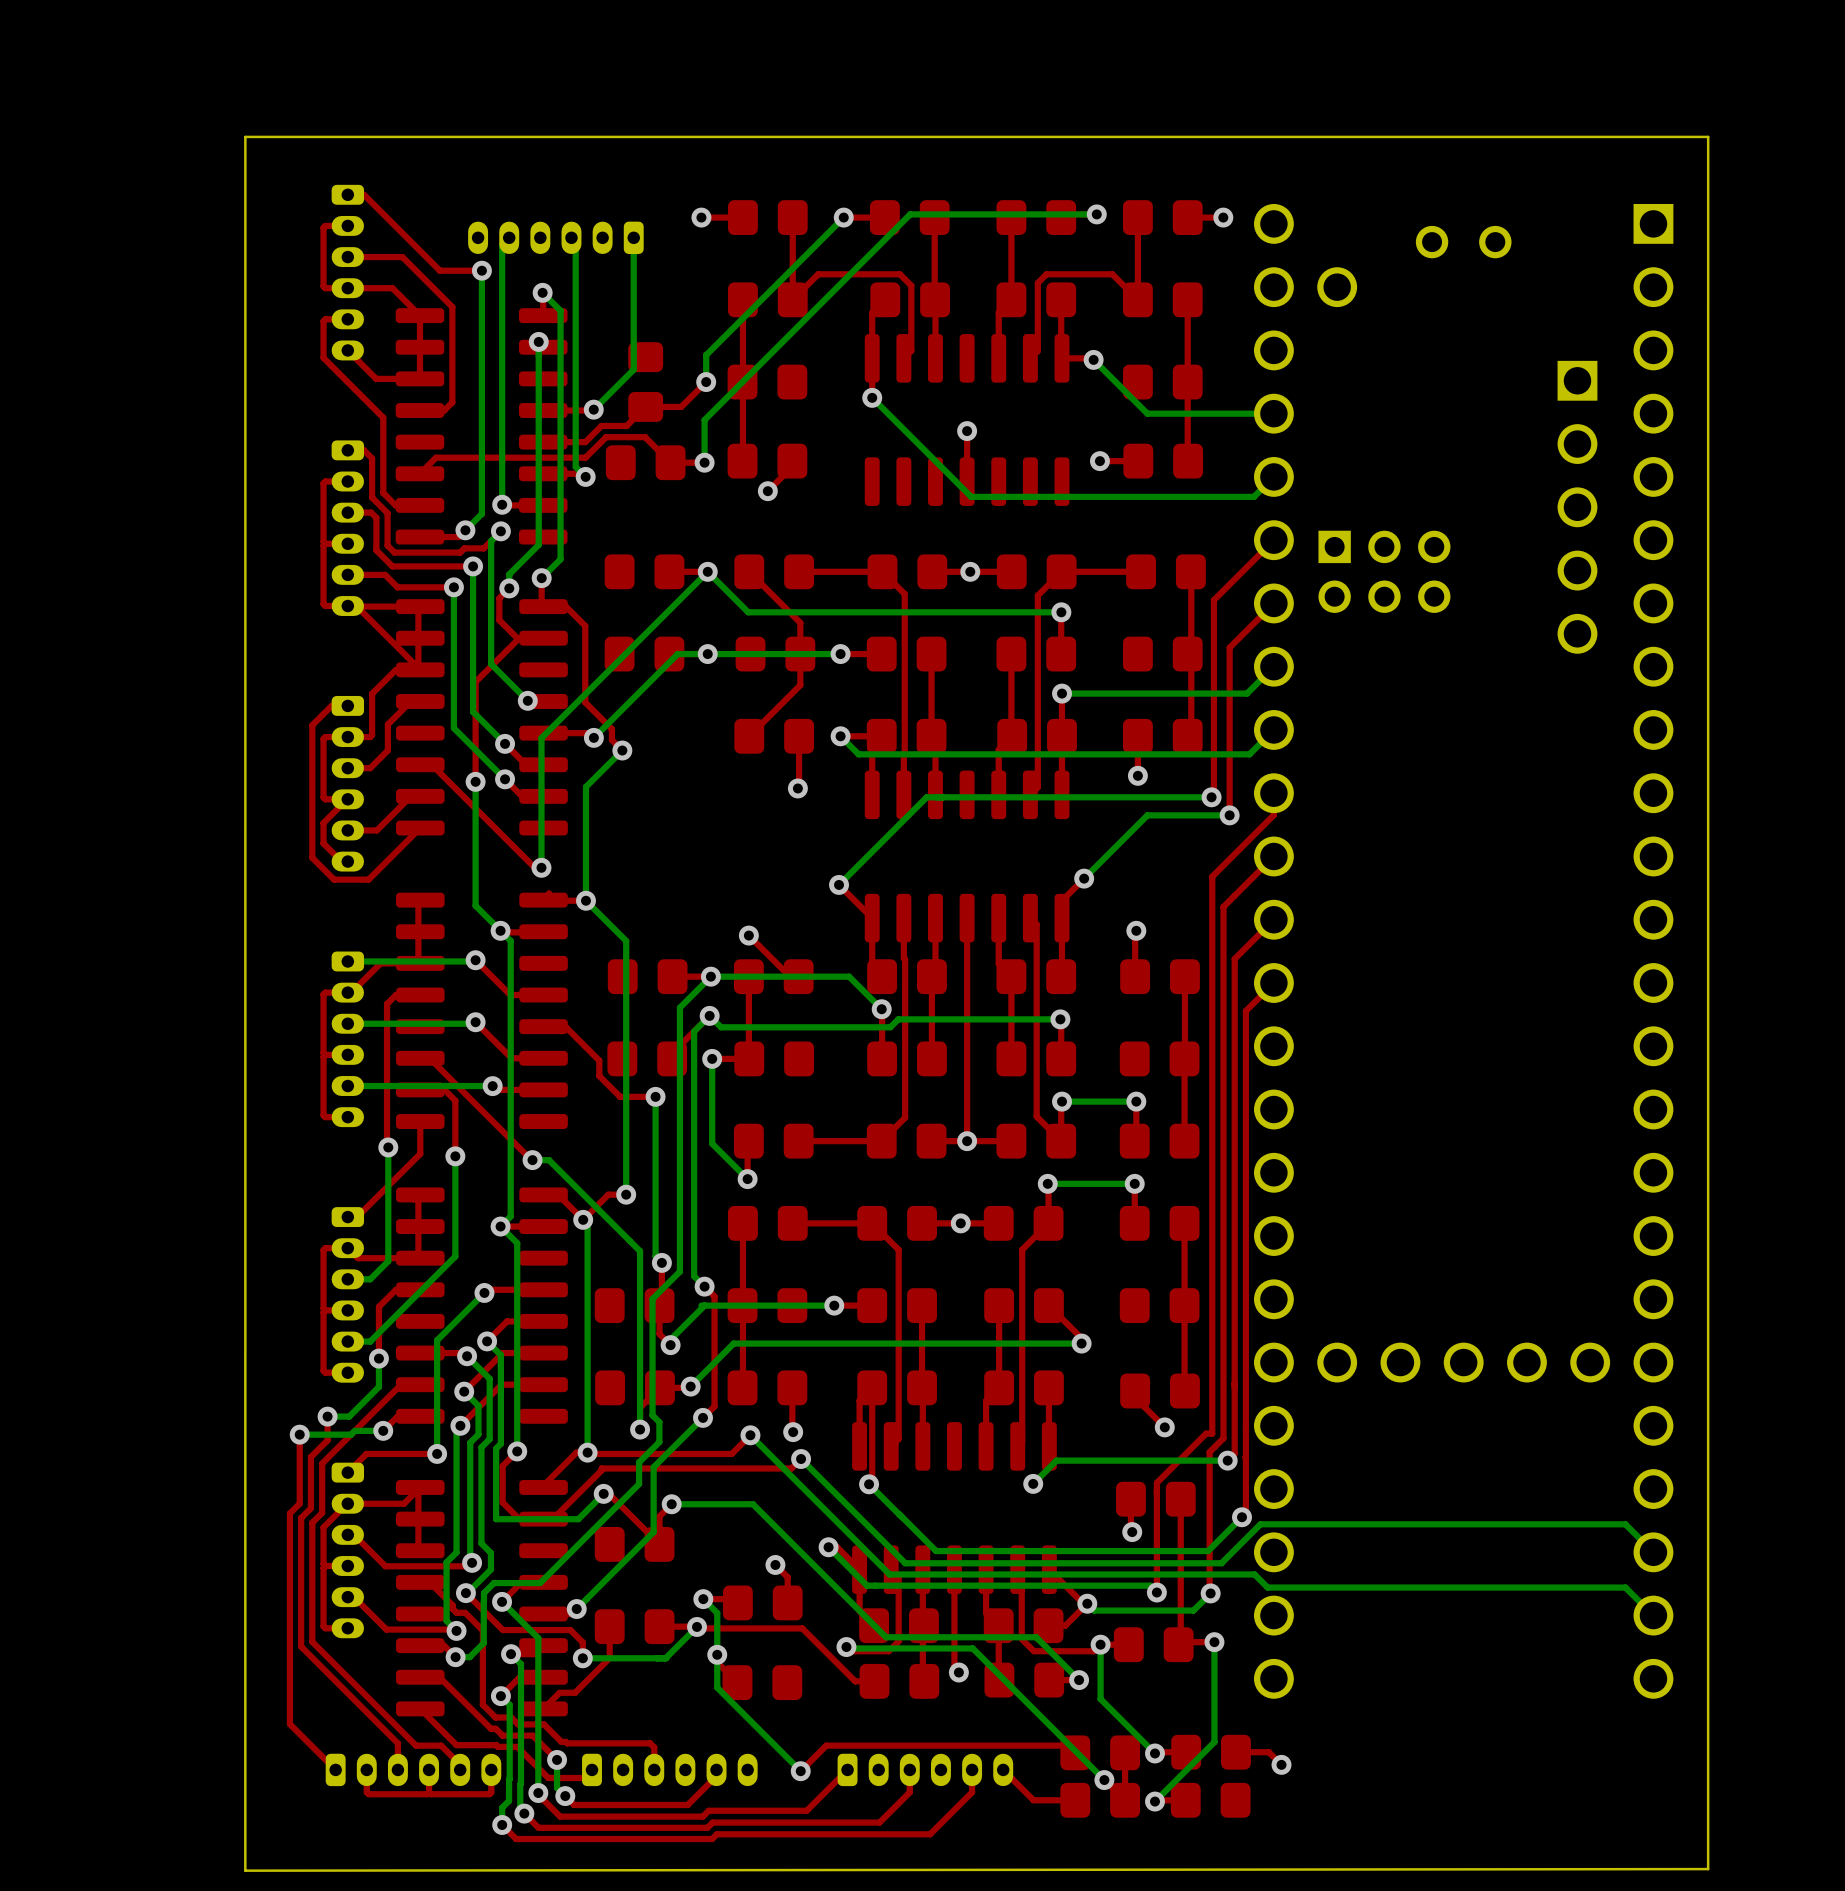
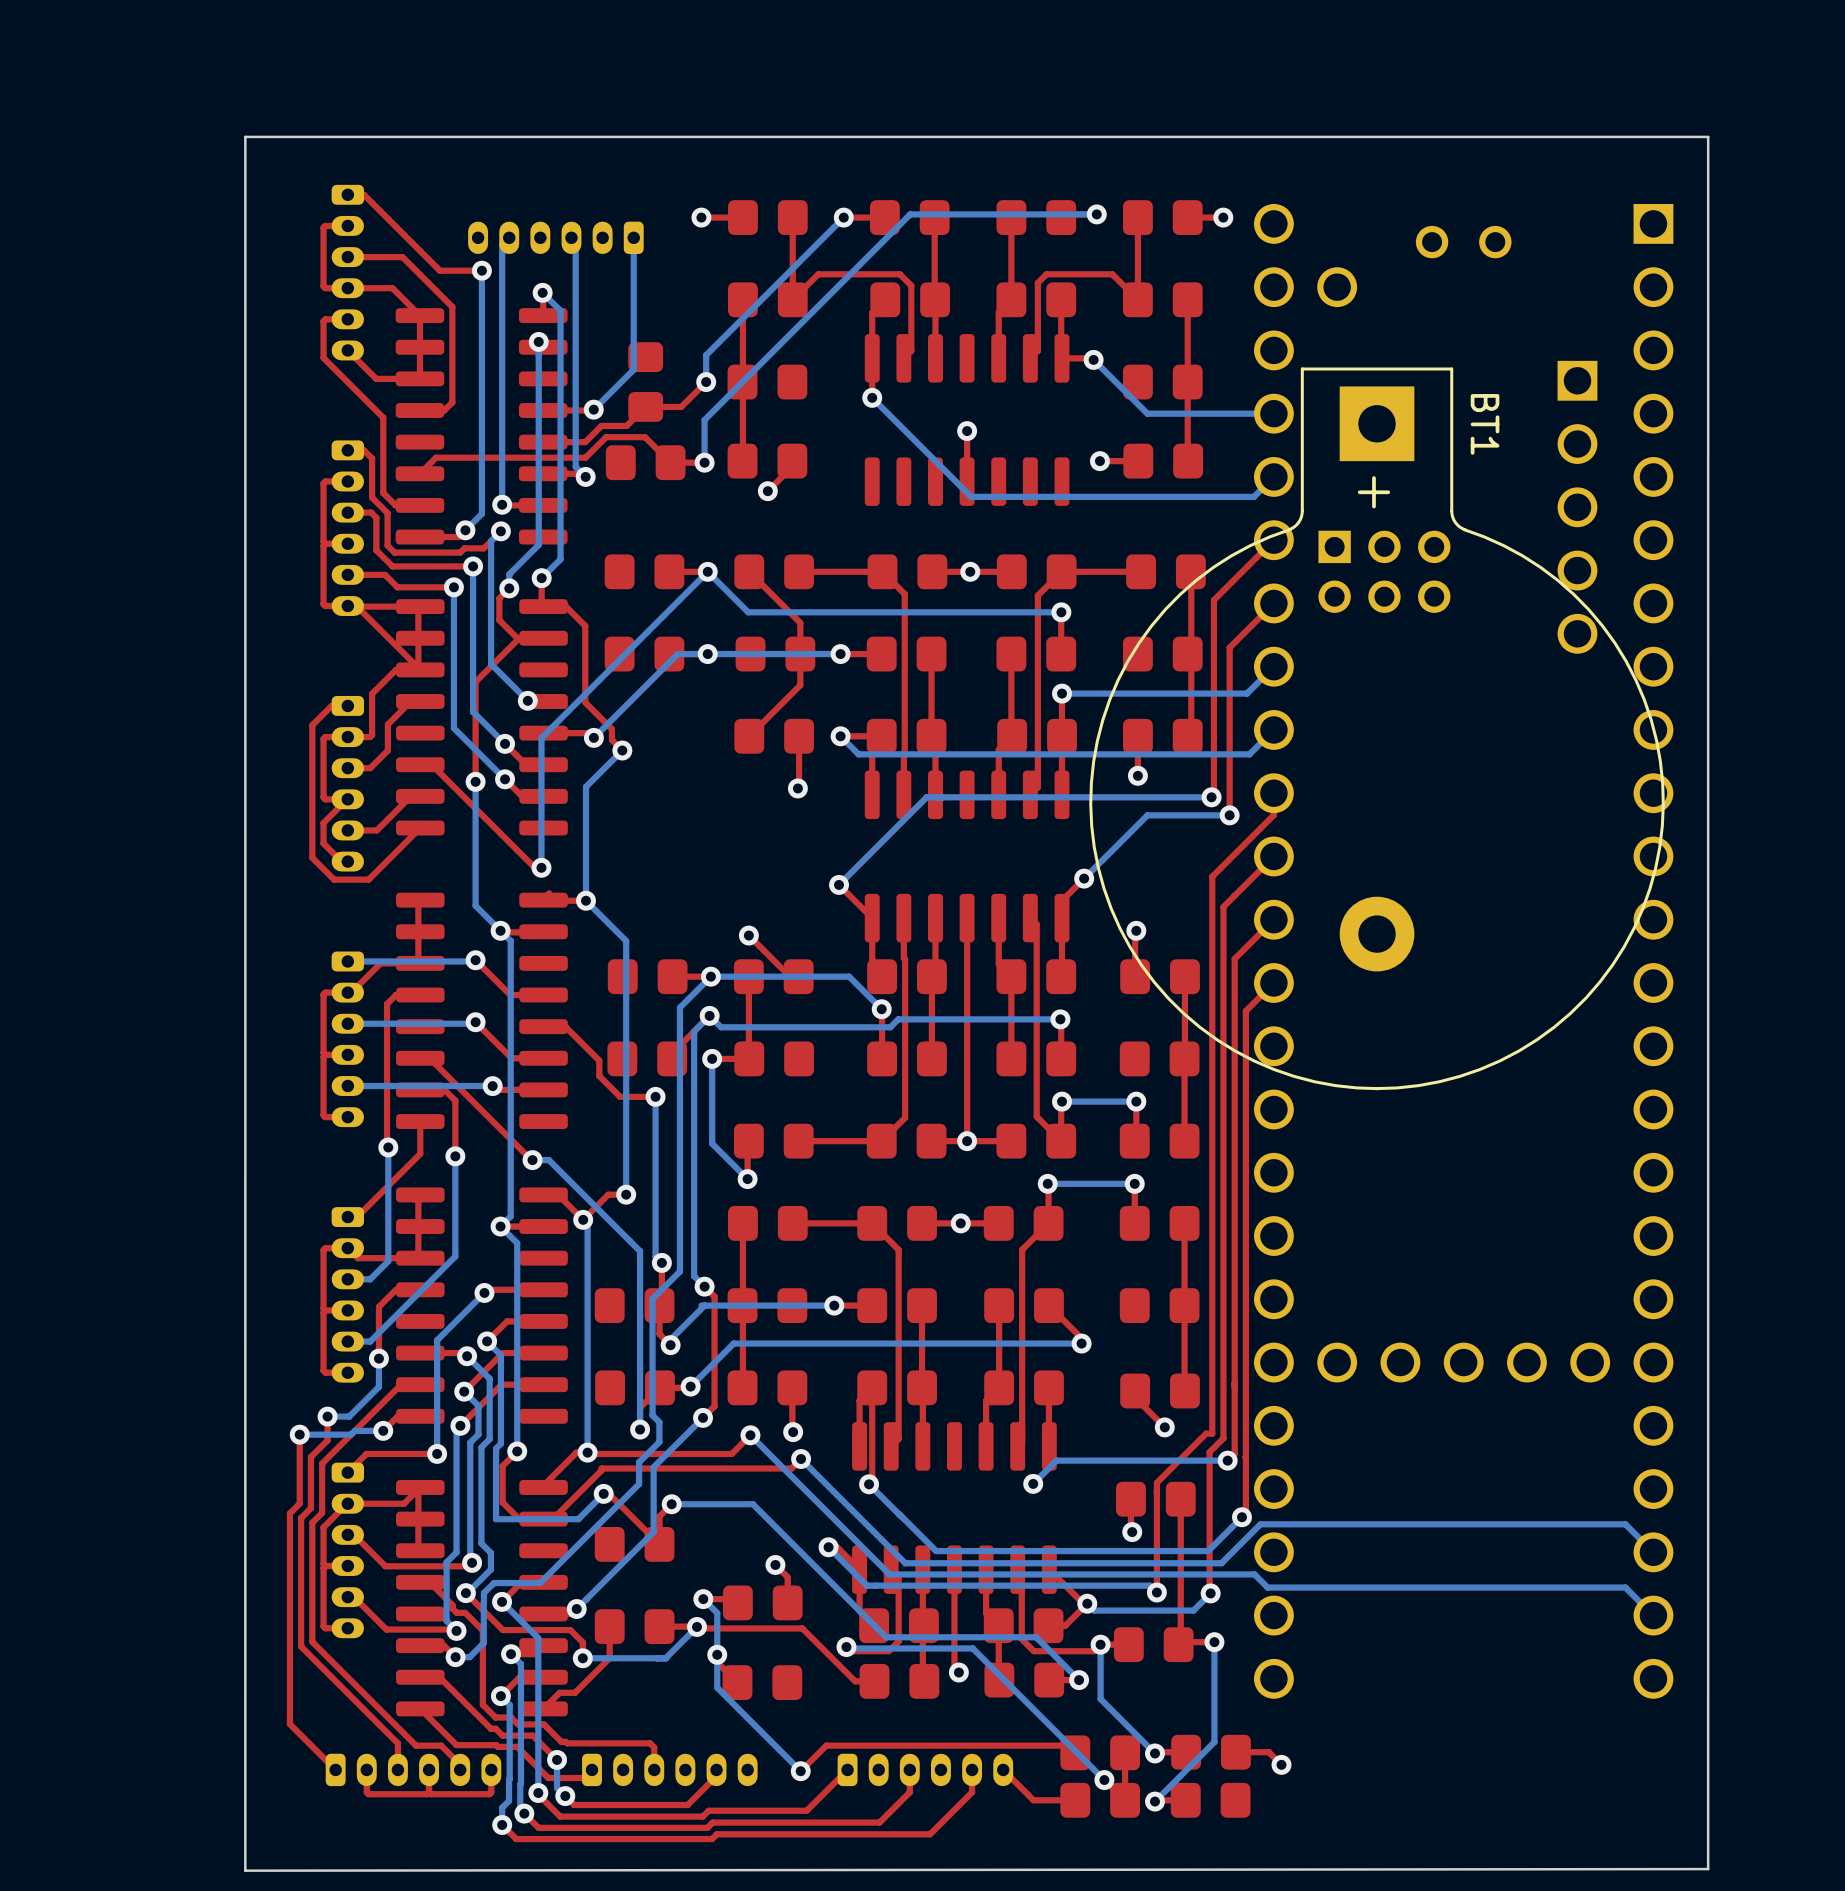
BT1: none -> (1377, 728)

